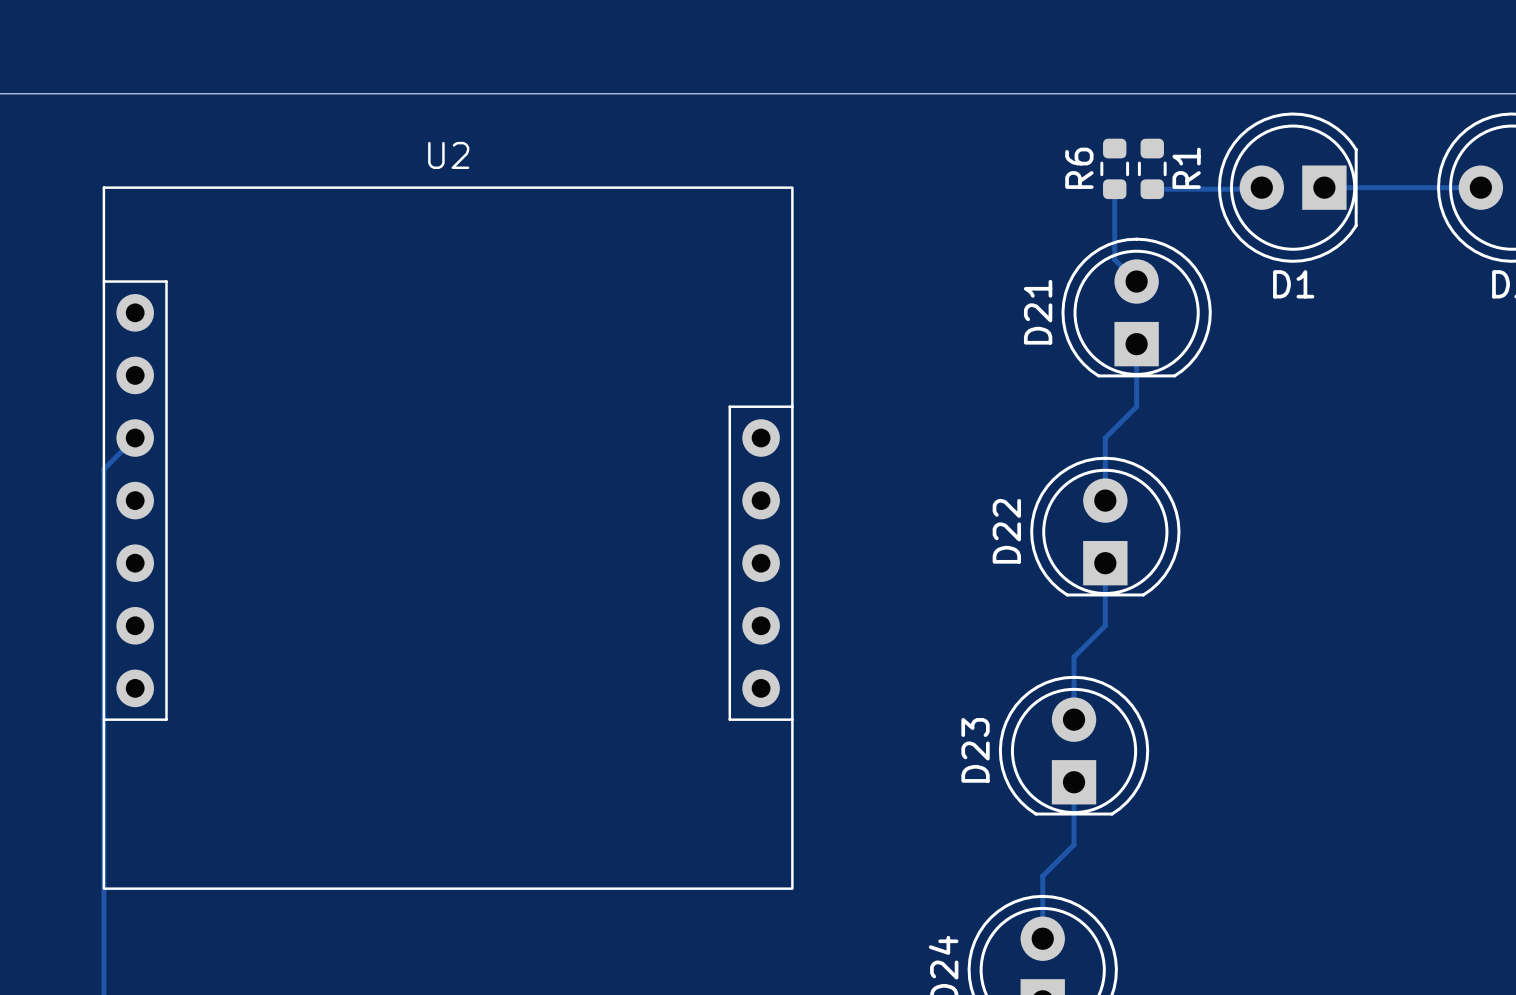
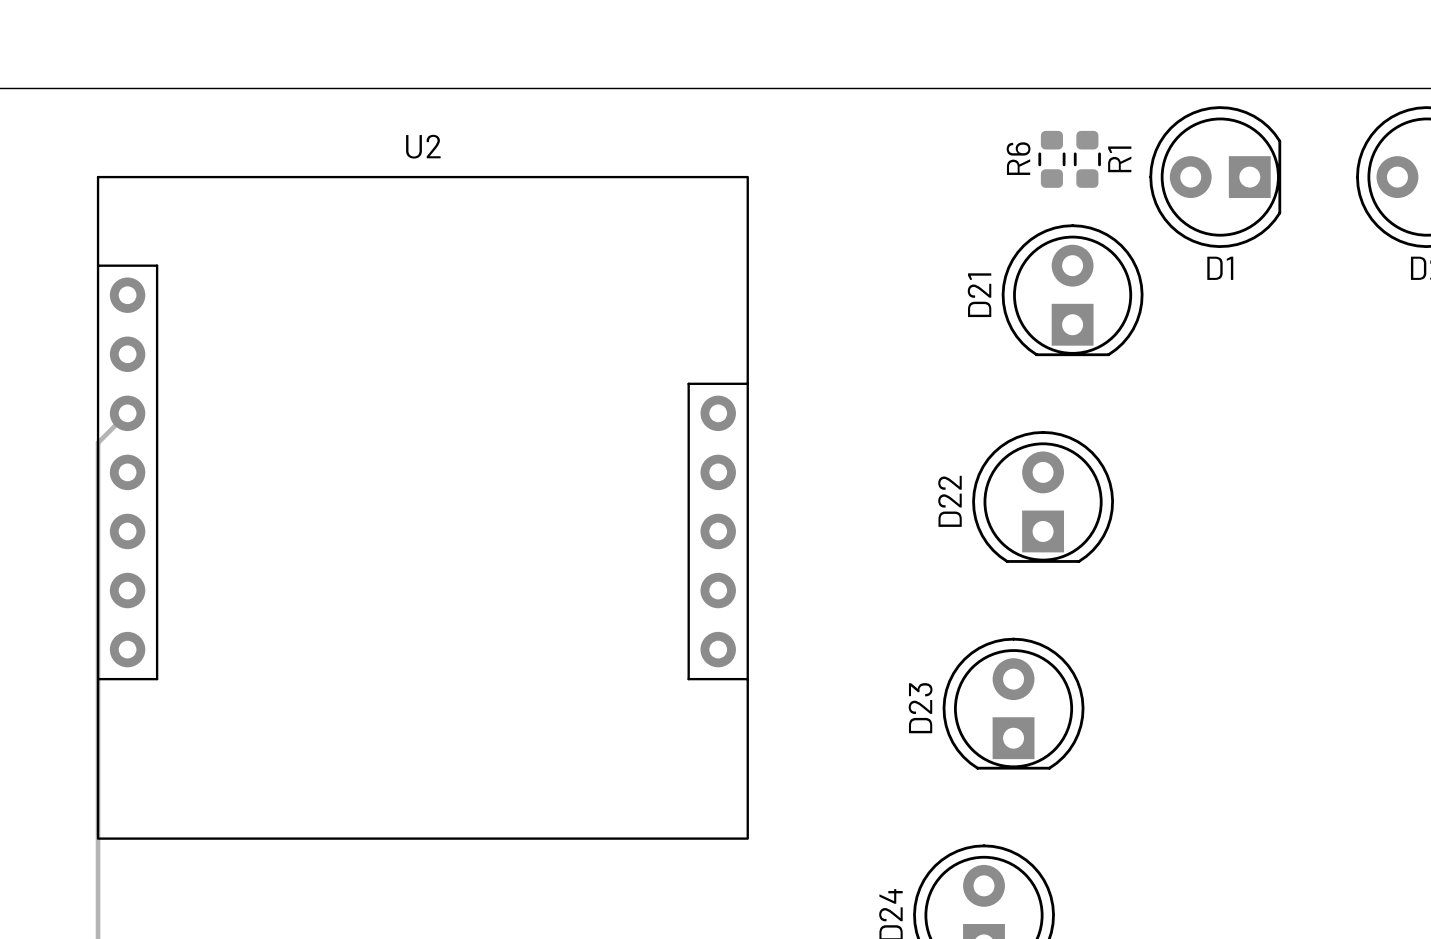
track: (1261, 187) (1260, 189) (1152, 189) -> none
track: (1324, 187) (1480, 187) -> none
track: (1114, 189) (1114, 259) (1136, 281) -> none
track: (1136, 344) (1136, 406) (1105, 438) (1105, 500) -> none
track: (1105, 563) (1105, 625) (1074, 657) (1074, 719) -> none
track: (1074, 782) (1074, 844) (1042, 876) (1042, 938) -> none

